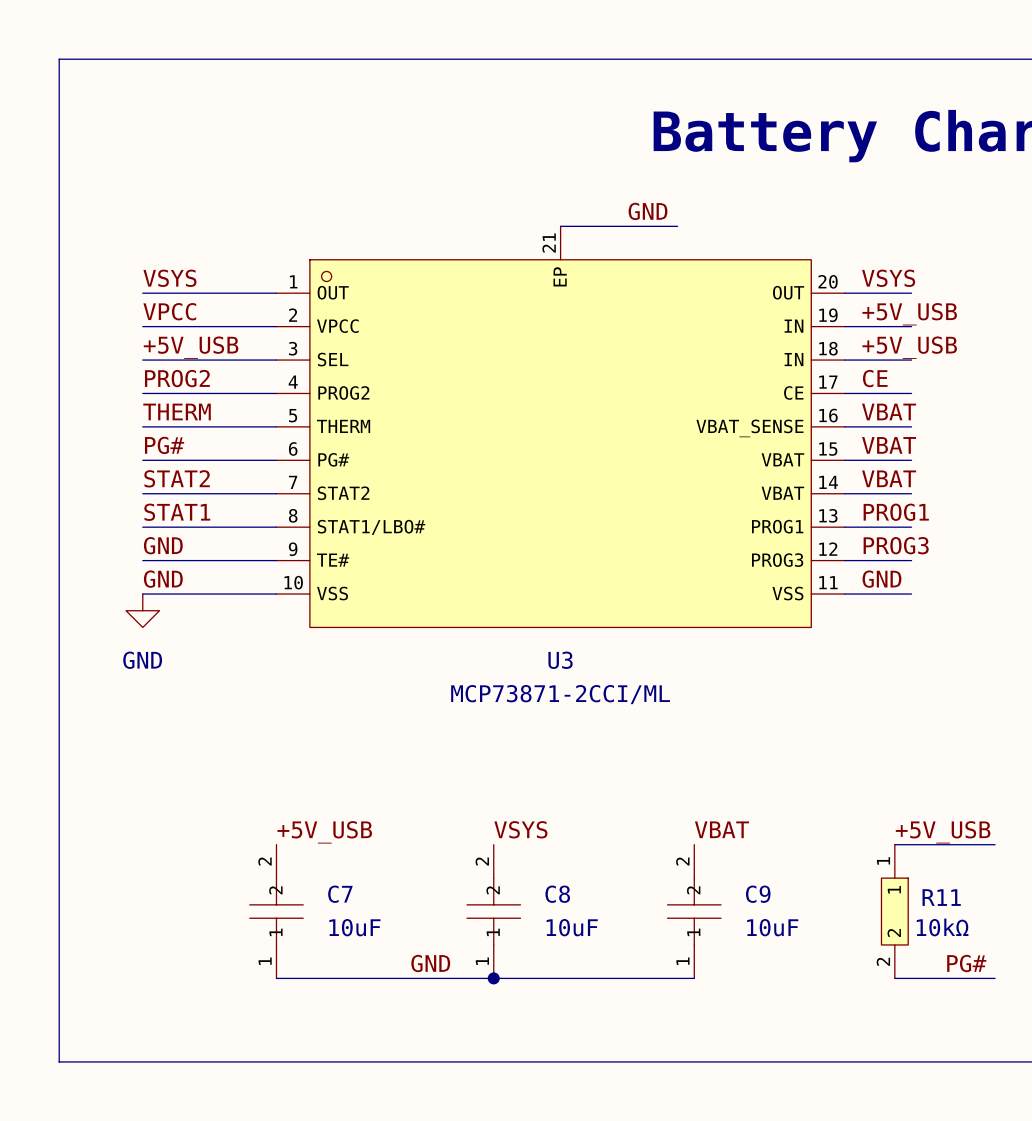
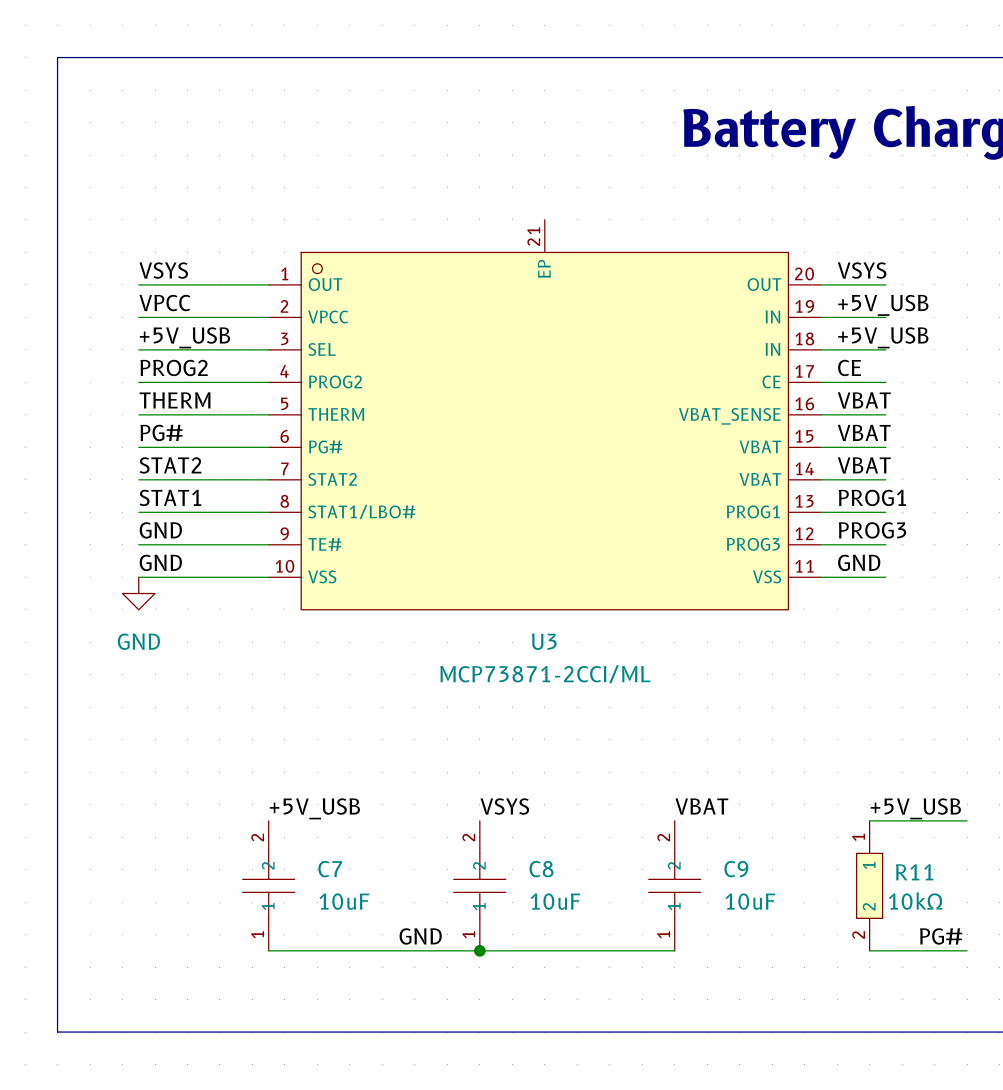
label: GND (648, 211) -> none
wire: (560, 226) (677, 226) -> none

